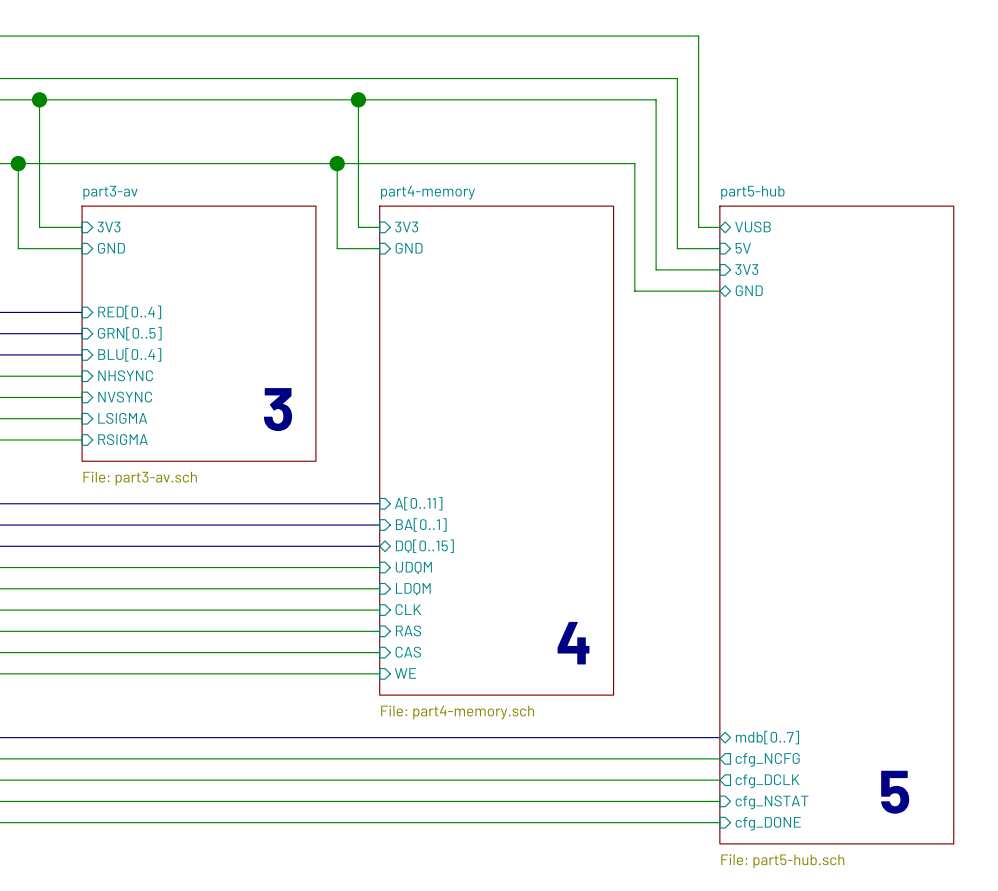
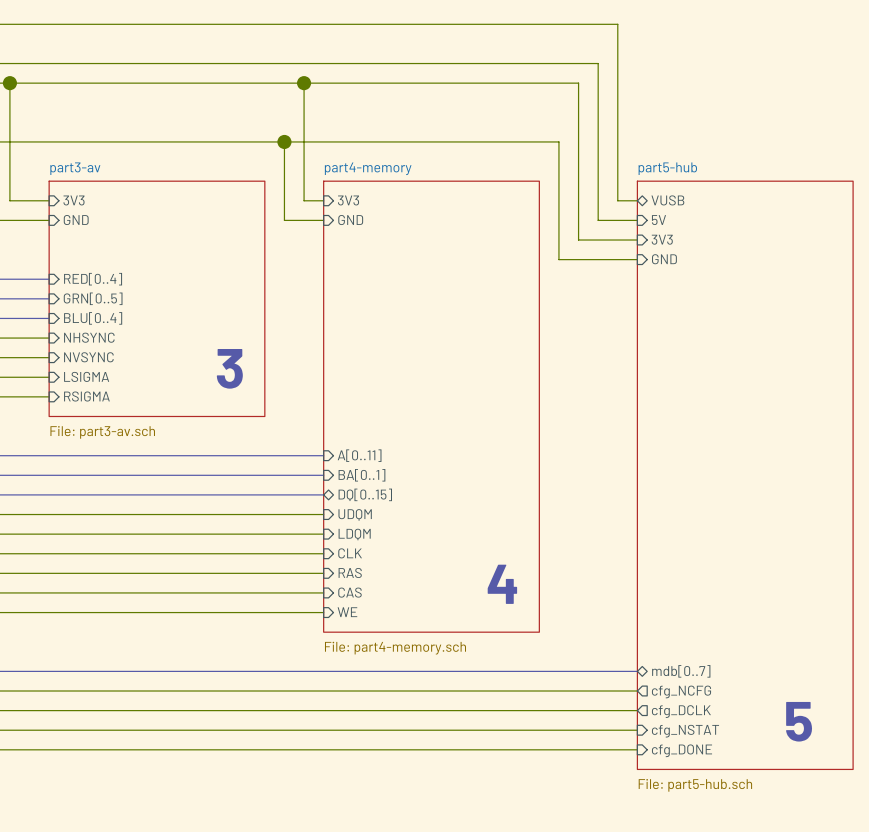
sheet pin shape: bidirectional (749, 290) -> input (664, 259)

